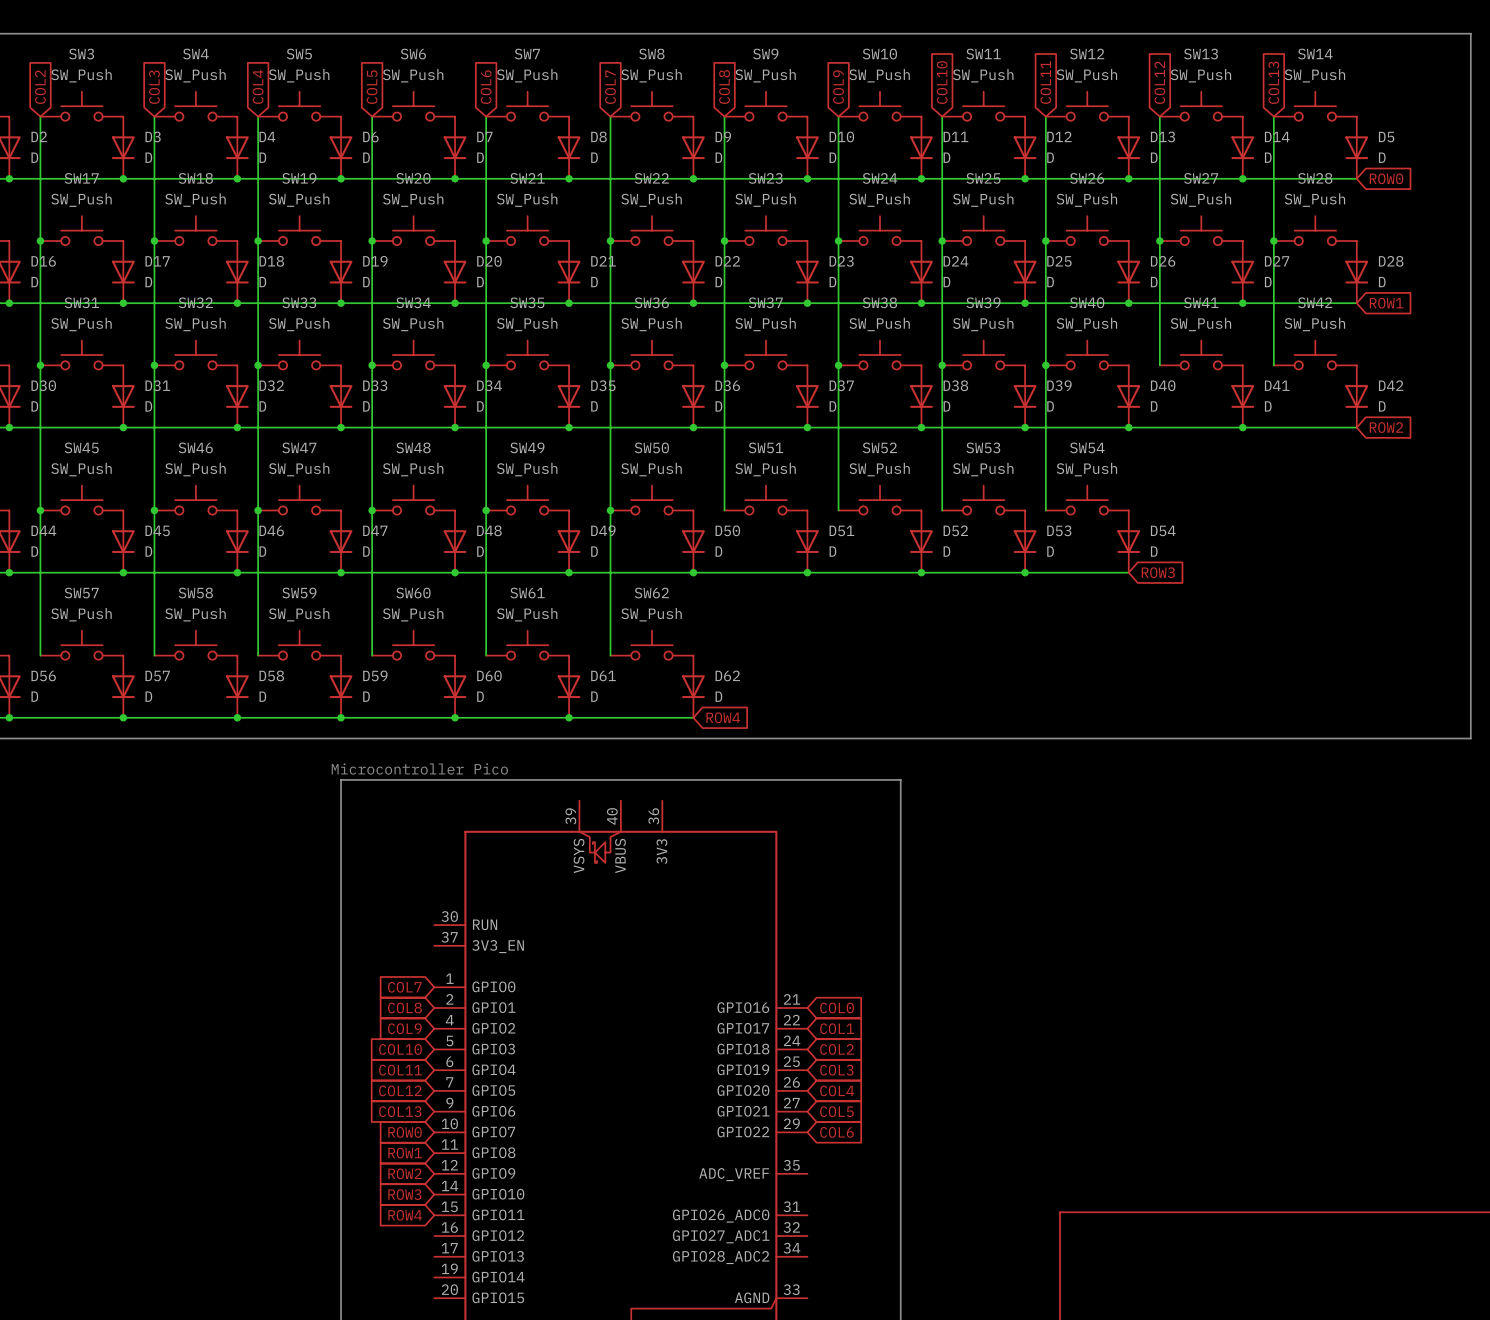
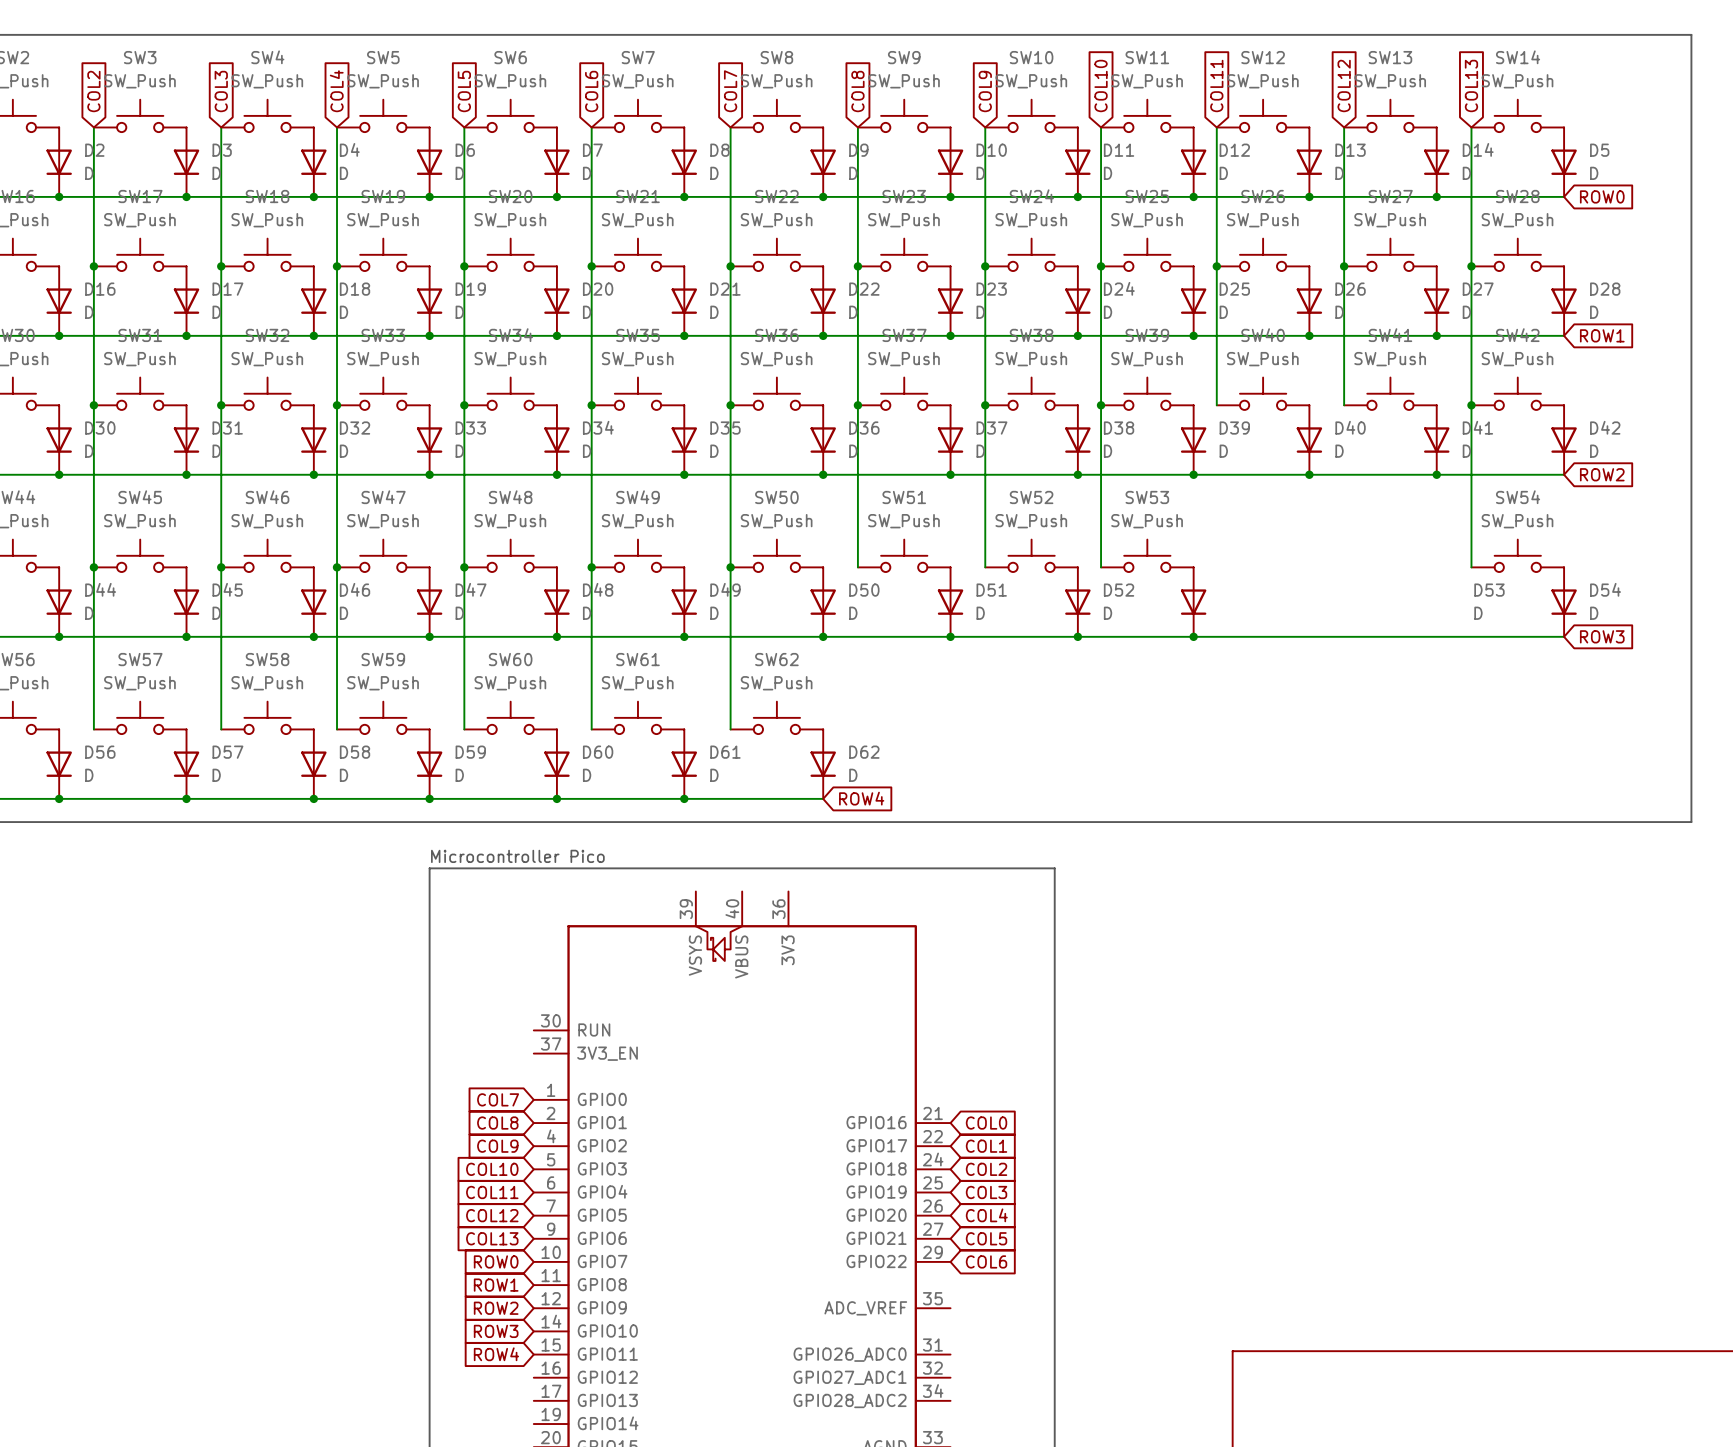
wire: (1045, 365) (1045, 510) -> none
junction: (1045, 365) -> none
wire: none -> (1471, 405) (1471, 567)
junction: none -> (1471, 405)
SW54 position: (1087, 500) -> (1517, 555)
D53 name position: D53 (1059, 530) -> D53 (1489, 590)
D54 position: (1128, 541) -> (1564, 602)
D53 value position: D (1050, 551) -> D (1478, 613)
wire: none -> (1309, 636) (1564, 636)
global label: ROW3 (1158, 572) -> none
global label: none -> ROW3 (1602, 636)

